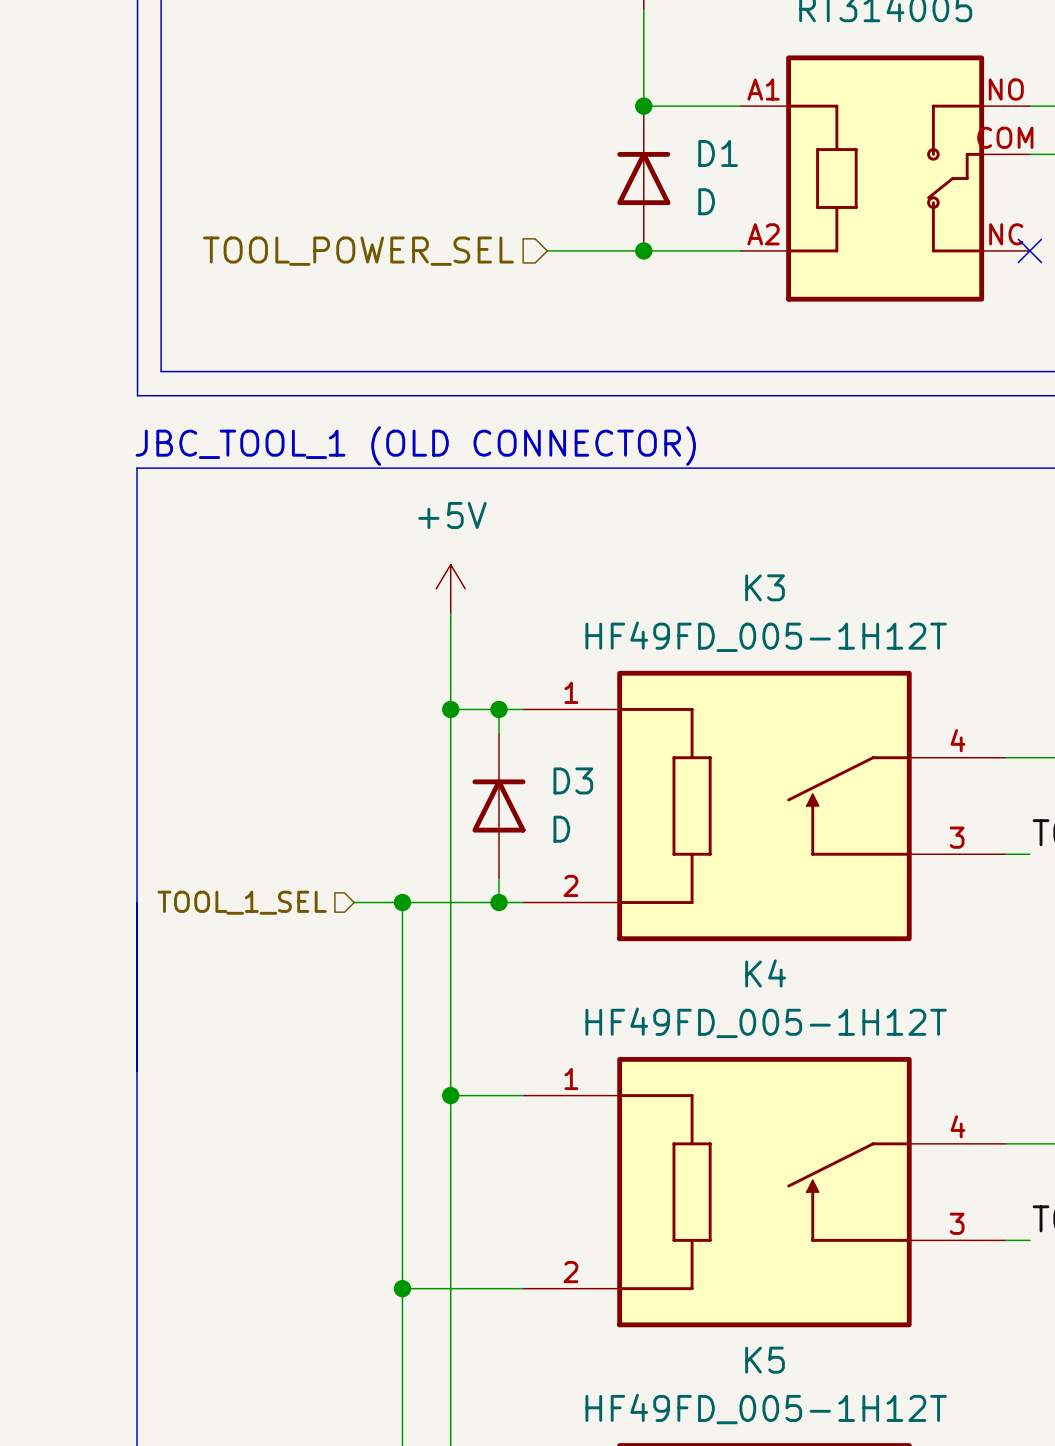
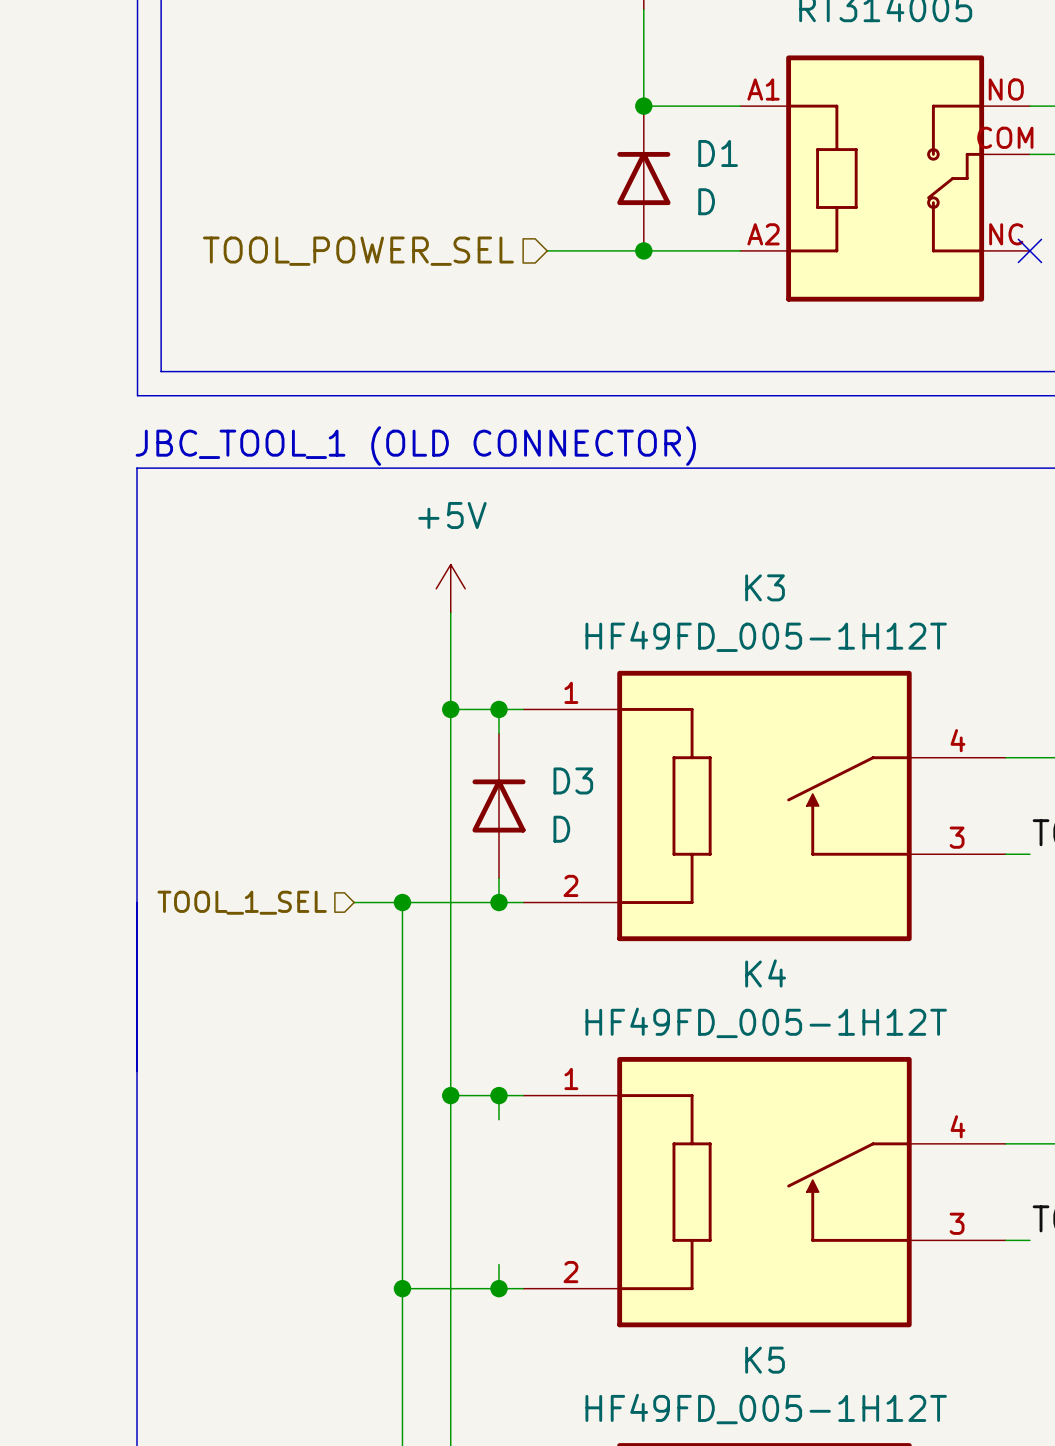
wire: none -> (499, 1095) (499, 1119)
junction: none -> (499, 1095)
wire: none -> (499, 1264) (499, 1288)
junction: none -> (499, 1288)

